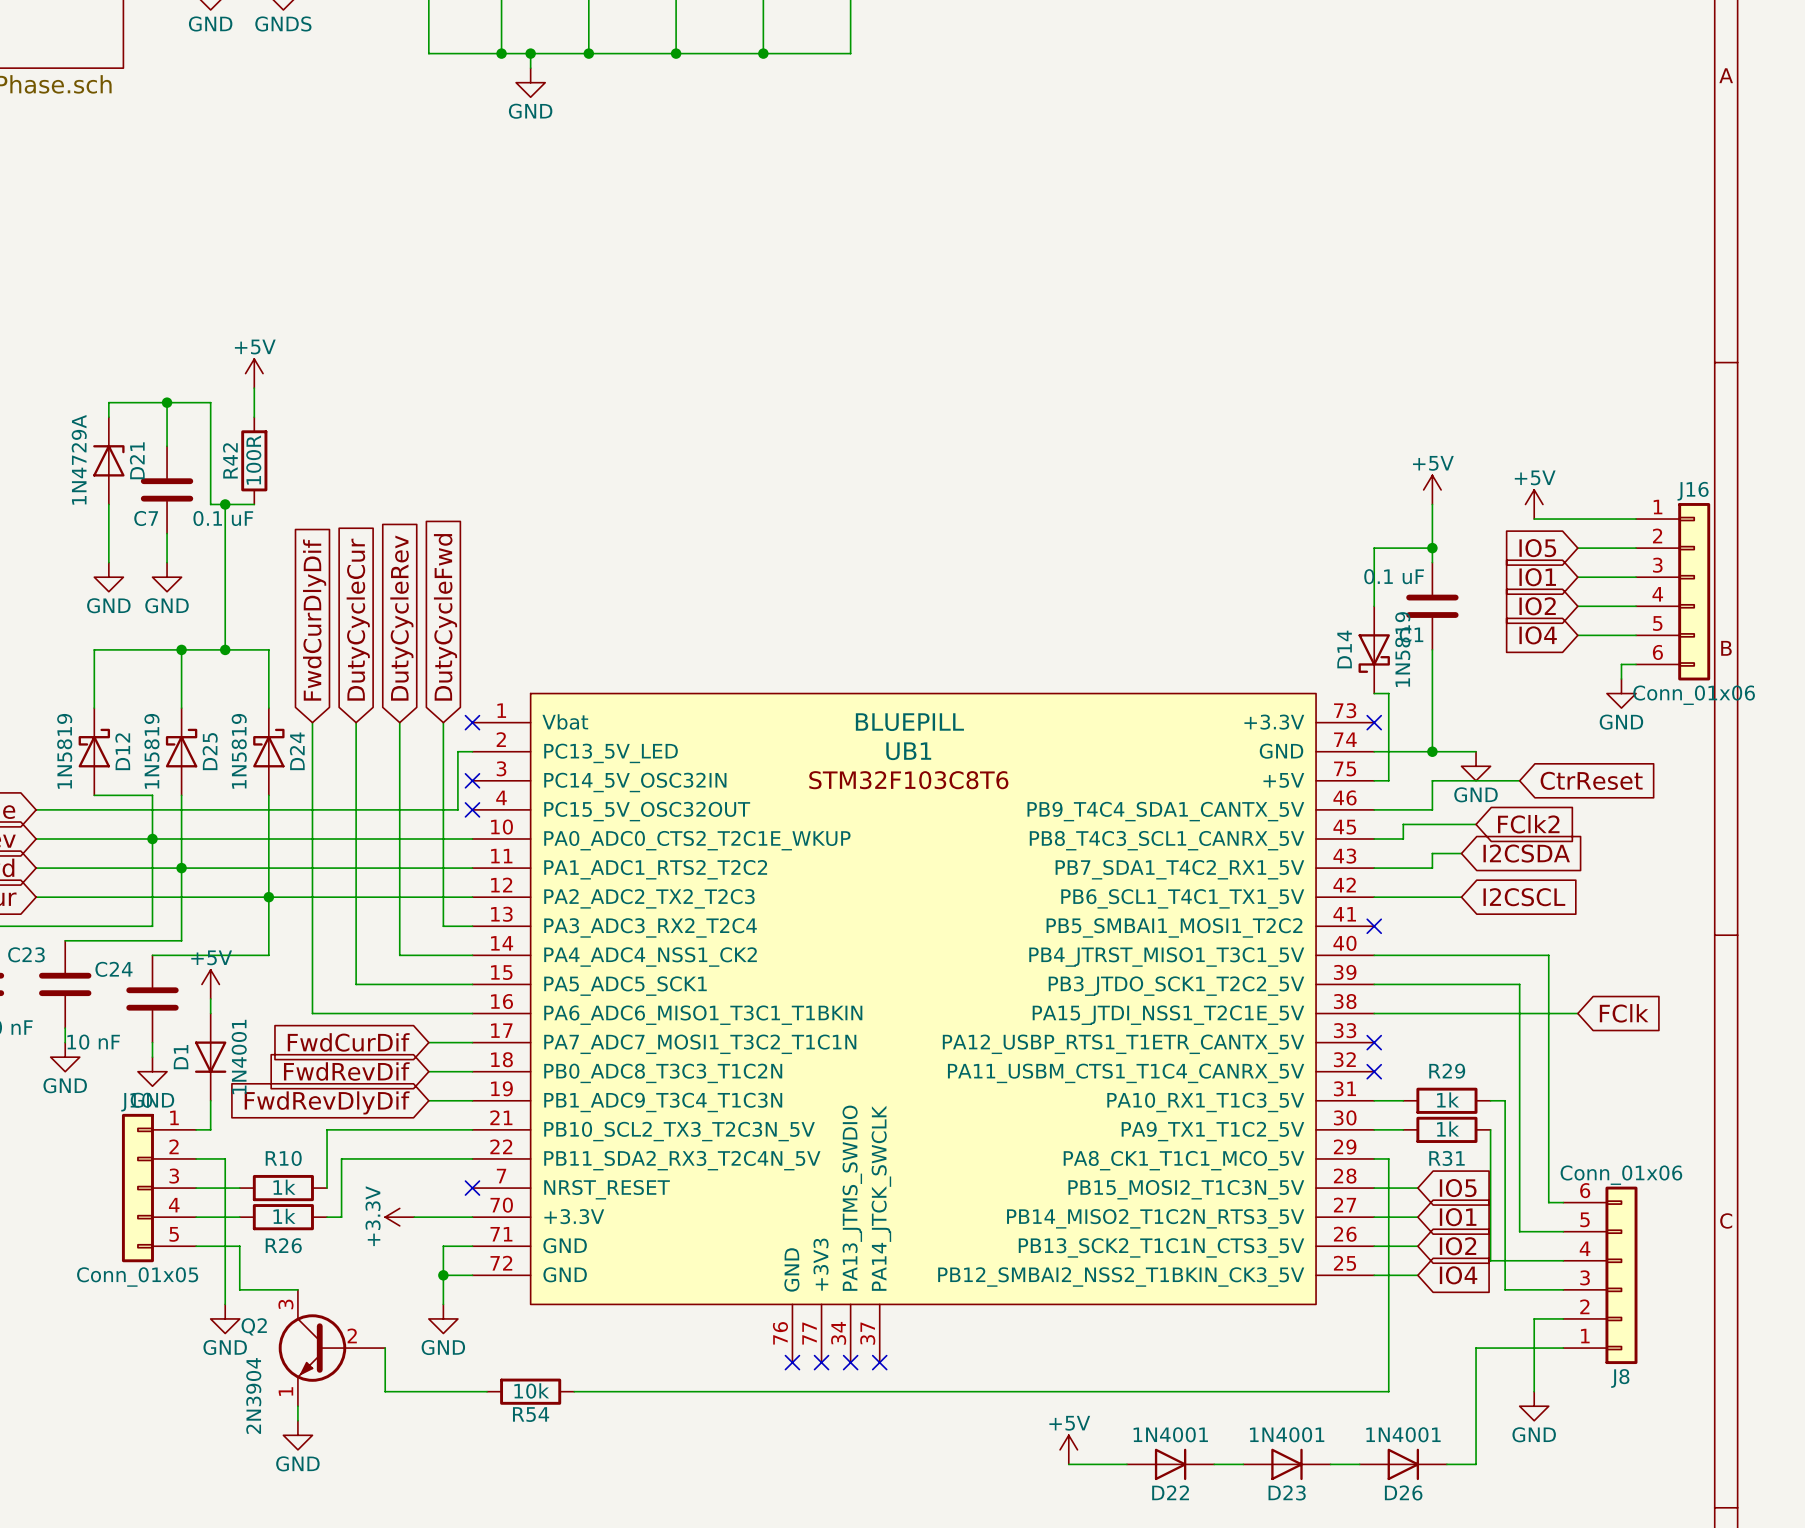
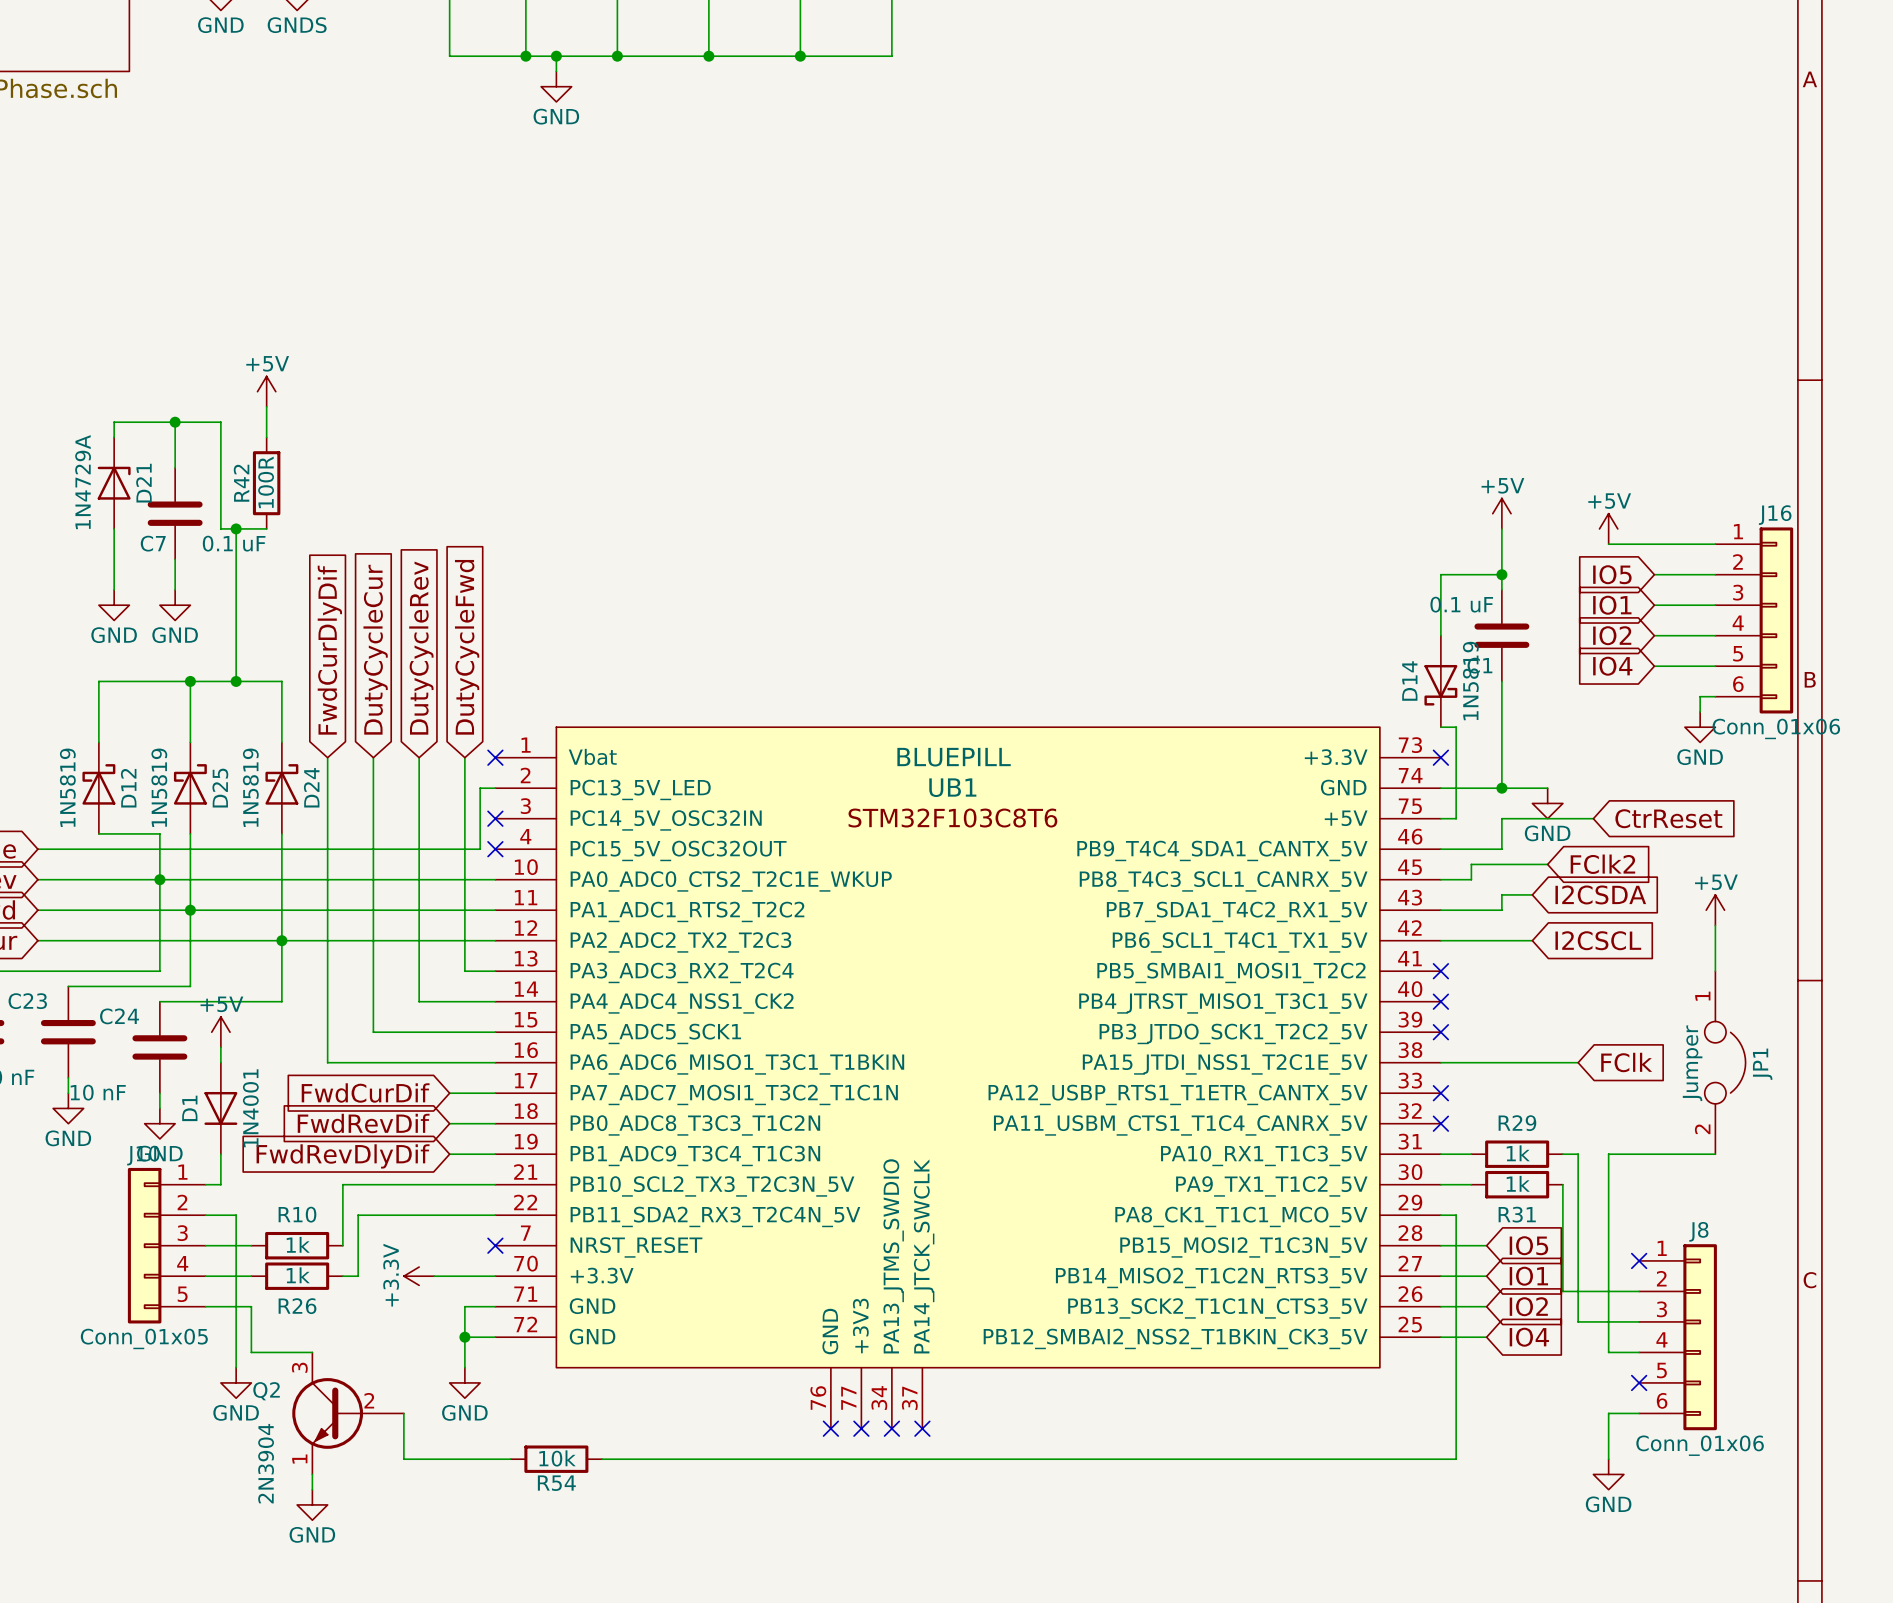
power symbol: none -> +5V (1715, 910)
wire: none -> (1715, 925) (1715, 971)
wire: (1374, 955) (1548, 955) (1548, 1202) (1563, 1202) -> none
no-connect mark: none -> (1440, 1001)
wire: (1374, 984) (1519, 984) (1519, 1231) -> none
no-connect mark: none -> (1440, 1032)
wire: (1505, 1013) (1577, 1013) -> none
global label position: FClk (1624, 1013) -> FClk (1626, 1062)
JP1: none -> Jumper (1725, 1062)
wire: none -> (1715, 1154) (1608, 1154) (1608, 1352)
no-connect mark: none -> (1639, 1260)
wire: (1490, 1231) (1490, 1260) (1505, 1260) (1505, 1289) (1534, 1289) -> (1562, 1291) (1593, 1291)
J8 flip: as is (1621, 1275) -> up-down (1700, 1337)
wire: (1563, 1318) (1534, 1318) (1534, 1348) (1476, 1348) (1476, 1464) (1446, 1464) -> none
no-connect mark: none -> (1639, 1382)
power symbol: +5V (1068, 1449) -> none
wire: (1068, 1464) (1126, 1464) -> none
D22: 1N4001 (1170, 1464) -> none
wire: (1214, 1464) (1243, 1464) -> none
D23: 1N4001 (1286, 1464) -> none
wire: (1330, 1464) (1359, 1464) -> none
D26: 1N4001 (1403, 1464) -> none

